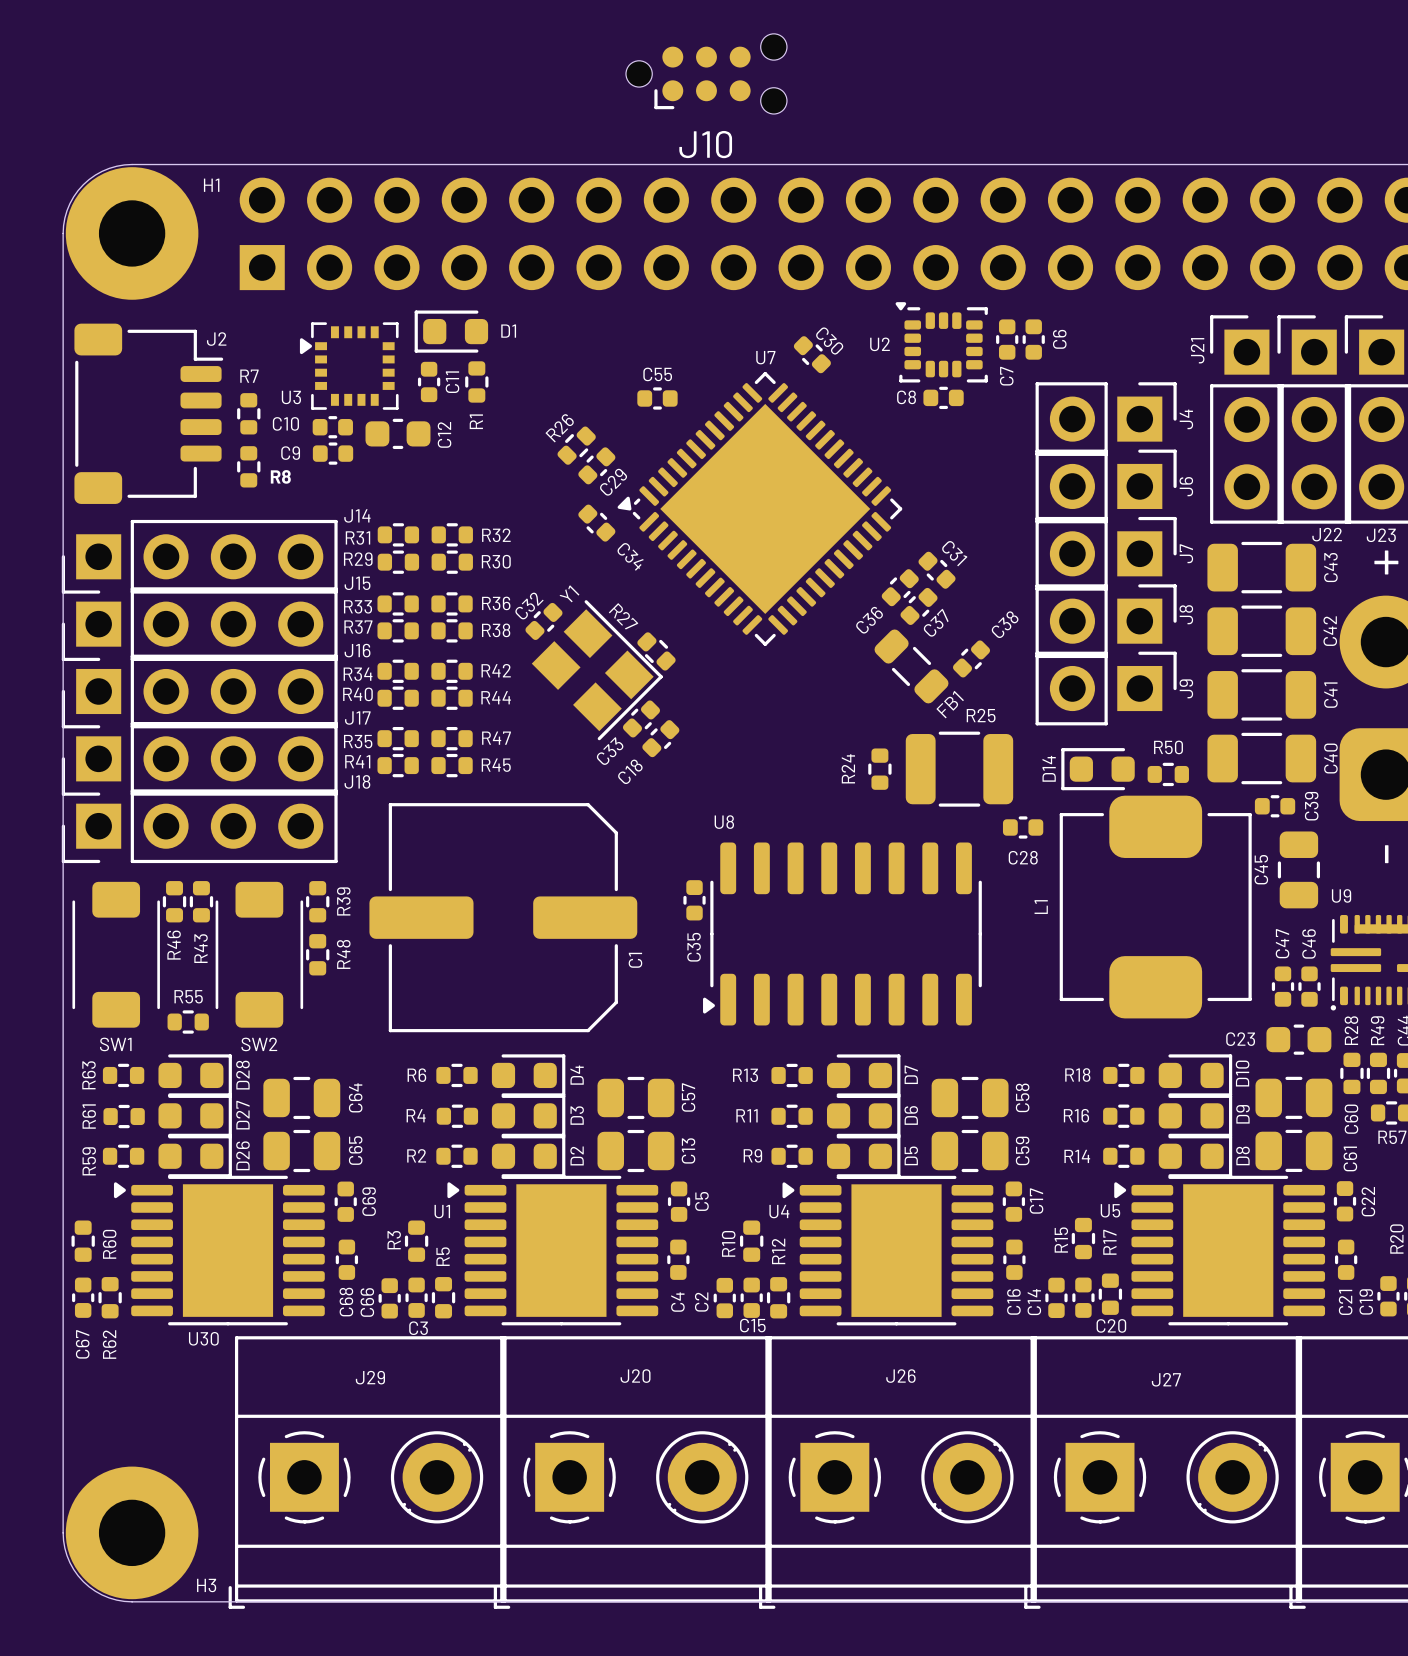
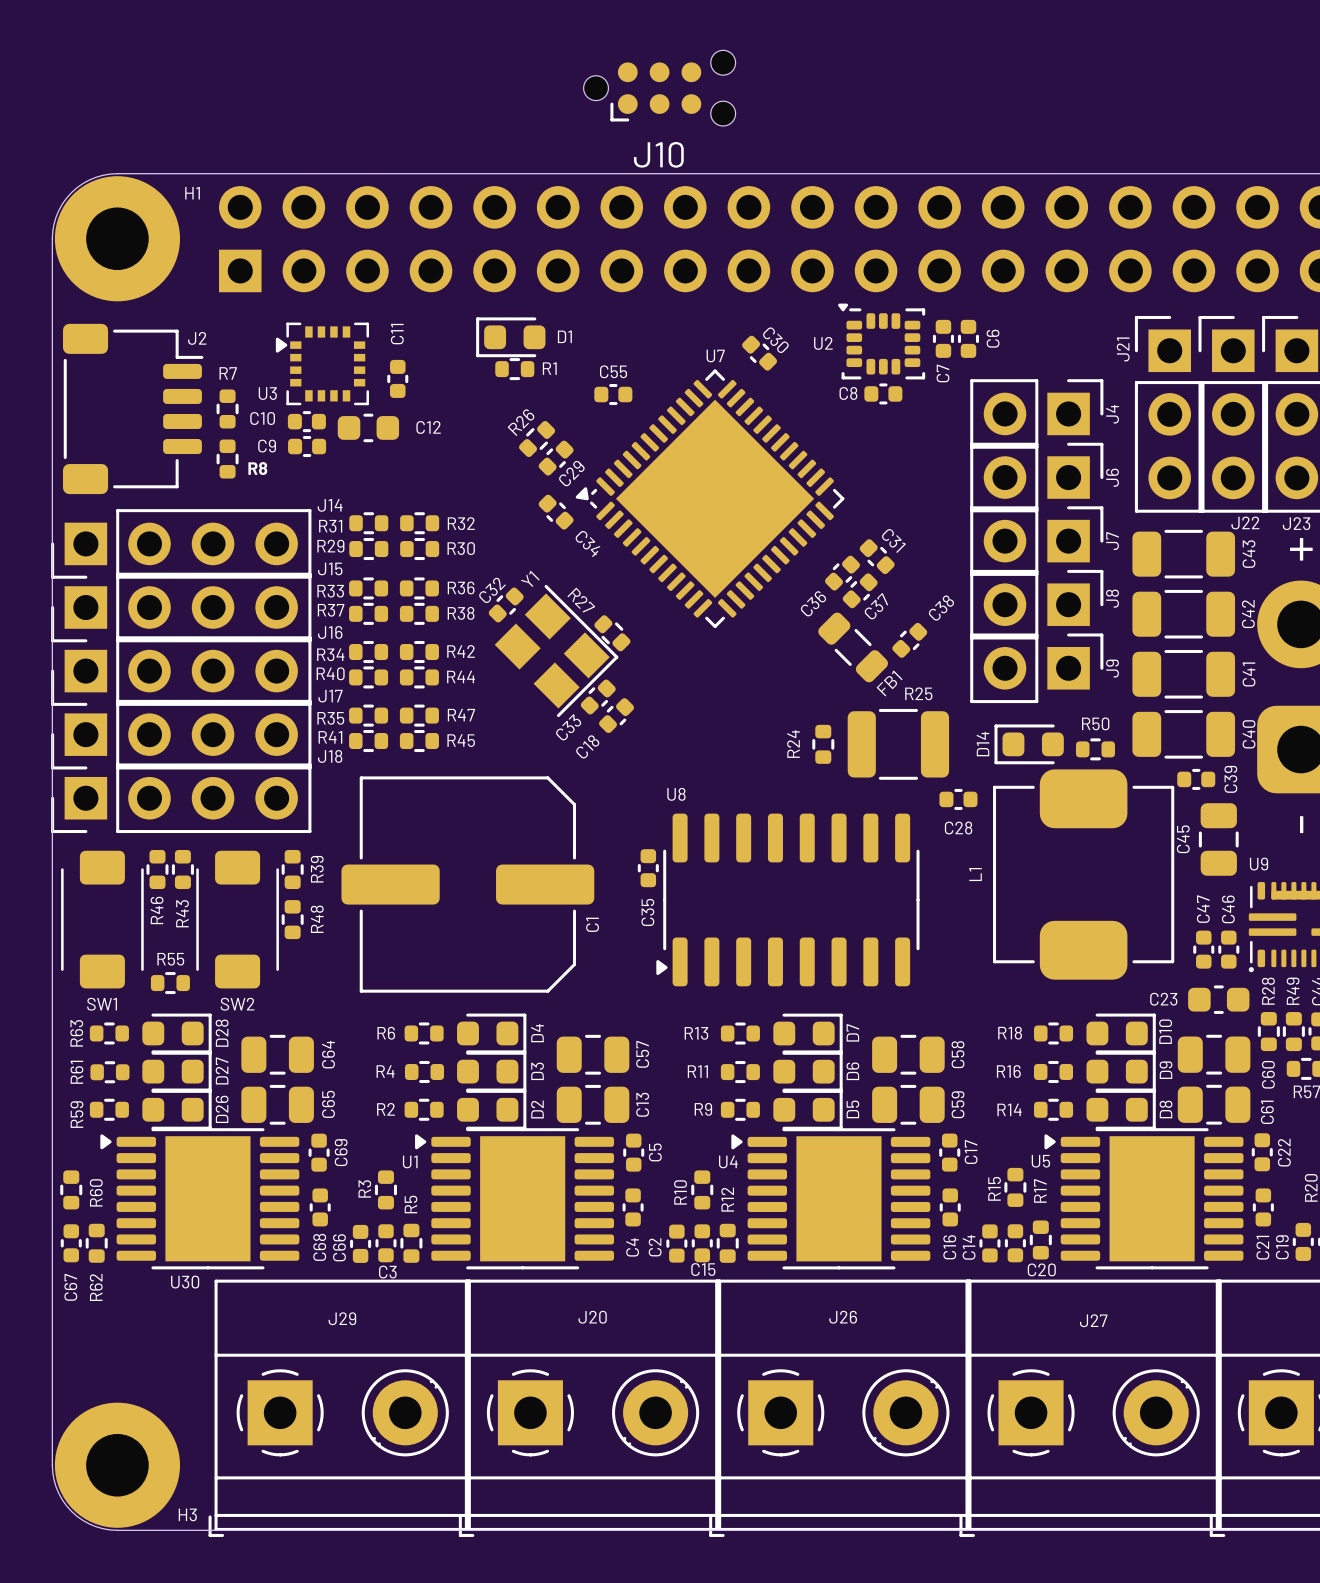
D1 position: (451, 331) -> (510, 337)
R1 rotation: 0° (476, 381) -> 90° clockwise (514, 369)
R1 position: (476, 381) -> (514, 369)
C11 name position: C11 (452, 382) -> C11 (397, 334)
R1 name position: R1 (476, 421) -> R1 (549, 368)
C12 name rotation: 0° (444, 434) -> 90° clockwise (428, 427)

